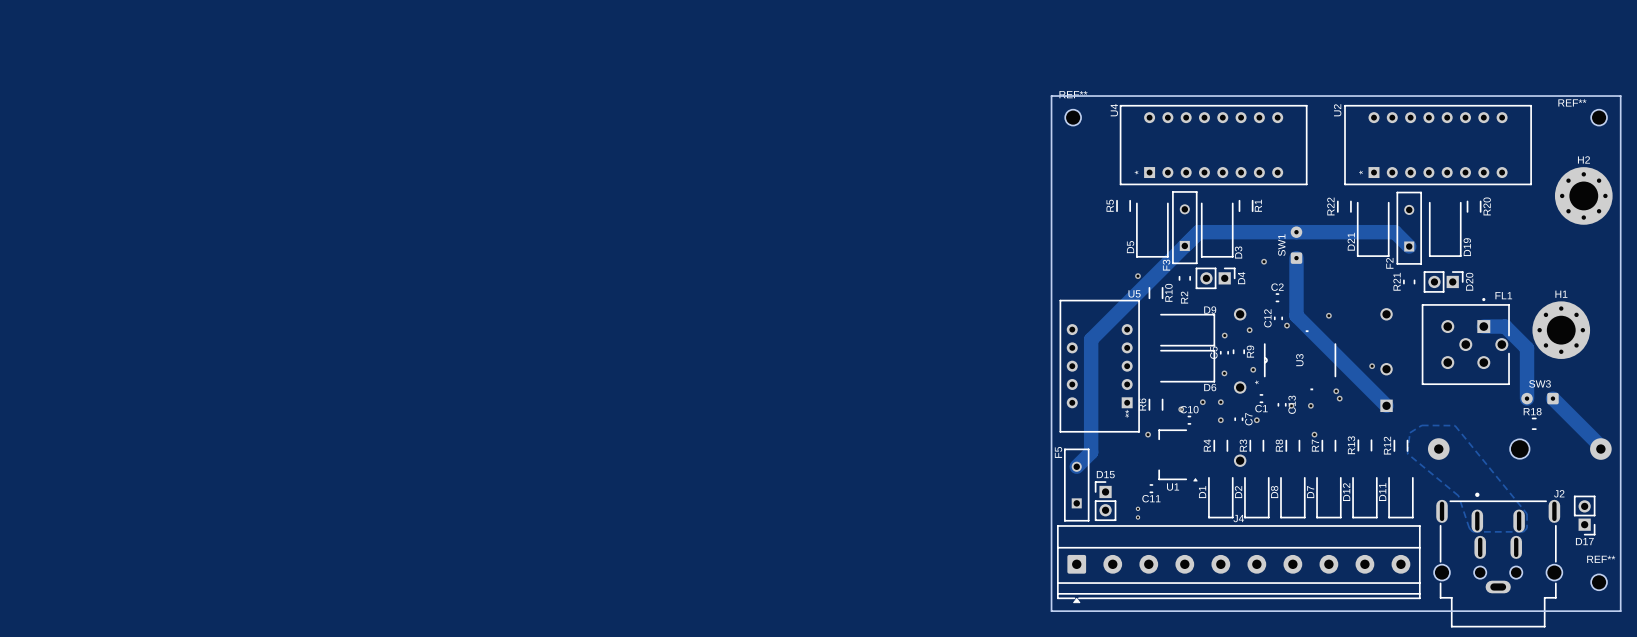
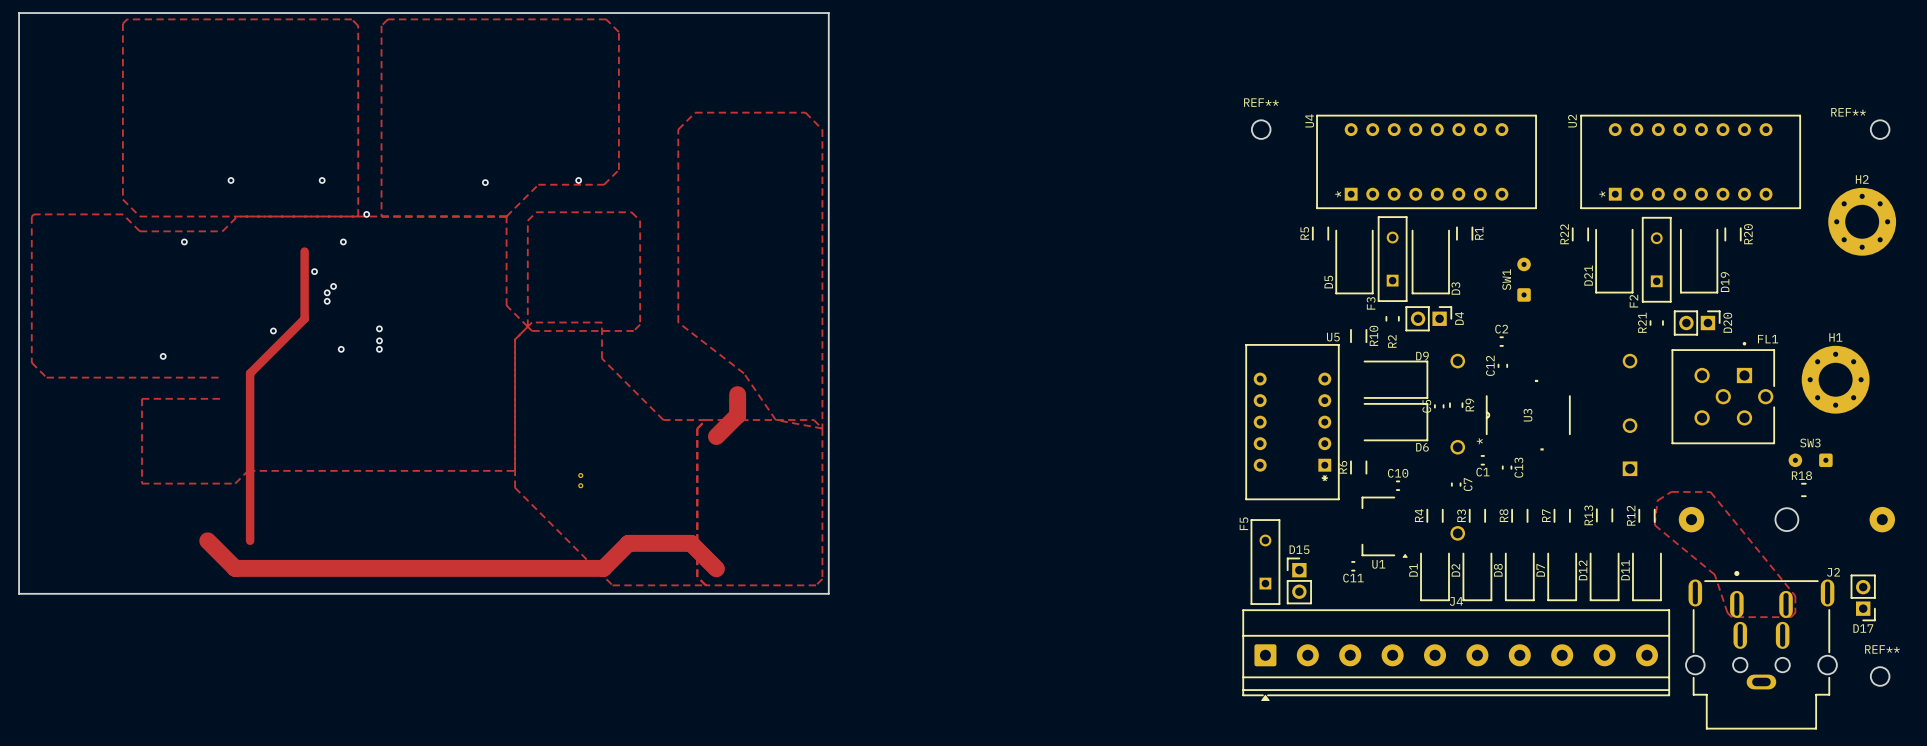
board edge: none -> (19, 13) (828, 13) (828, 593) (19, 593) (19, 13)
board edge: (1051, 96) (1620, 96) (1620, 611) (1051, 611) (1051, 96) -> none
zone outline: none -> (695, 112) (678, 129) (678, 322) (743, 373) (775, 420) (822, 428) (813, 420) (663, 420) (601, 358) (601, 322) (532, 322) (515, 339) (515, 487) (612, 585) (816, 585) (822, 578) (822, 129) (805, 112) (695, 112)
via: none -> (231, 180)
via: none -> (322, 180)
via: none -> (578, 180)
via: none -> (485, 182)
via: none -> (366, 214)
zone outline: none -> (237, 216) (222, 231) (139, 231) (122, 214) (33, 214) (31, 216) (31, 362) (46, 377) (222, 377)
zone outline: none -> (358, 216) (358, 25) (351, 19) (127, 19) (122, 23) (122, 199) (139, 216) (506, 216)
zone outline: none -> (381, 216) (381, 25) (387, 19) (606, 19) (618, 32) (618, 169) (604, 184) (538, 184) (506, 216)
zone outline: none -> (506, 216) (506, 305) (532, 330) (633, 330) (640, 324) (640, 220) (631, 212) (536, 212) (527, 220) (527, 326)
via: none -> (184, 241)
via: none -> (343, 241)
track: none -> (304, 251) (304, 318) (250, 373) (250, 540)
via: none -> (314, 271)
track: (1409, 246) (1394, 232) (1198, 232) (1091, 339) (1091, 452) (1076, 466) -> none
via: none -> (333, 286)
via: none -> (327, 292)
track: (1296, 258) (1296, 315) (1386, 405) -> none
via: (1264, 261) -> none
via: none -> (327, 301)
via: (1137, 276) -> none
via: none -> (379, 328)
via: none -> (273, 330)
via: none -> (379, 340)
via: none -> (341, 349)
via: none -> (379, 349)
via: none -> (163, 356)
via: (1328, 315) -> none
via: (1286, 325) -> none
track: (1483, 326) (1505, 326) (1527, 348) (1527, 398) -> none
via: (1249, 330) -> none
via: (1224, 335) -> none
track: none -> (737, 394) (737, 415) (716, 436)
zone outline: none -> (222, 398) (142, 398) (142, 483) (235, 483) (247, 470) (515, 470)
zone outline: none -> (705, 420) (697, 428) (697, 576) (705, 585)
via: (1372, 366) -> none
via: (1253, 369) -> none
via: (1224, 373) -> none
via: (1336, 391) -> none
via: (1339, 398) -> none
track: (1552, 398) (1600, 446) (1600, 449) -> none
via: (1202, 402) -> none
via: (1220, 402) -> none
via: (1291, 405) -> none
via: (1310, 405) -> none
via: (1181, 409) -> none
part: none -> (580, 480)
via: (1220, 420) -> none
via: (1256, 420) -> none
via: (1148, 434) -> none
via: (1314, 434) -> none
track: none -> (207, 540) (235, 568) (603, 568) (628, 543) (690, 543) (716, 568)
part: (1137, 513) -> none

